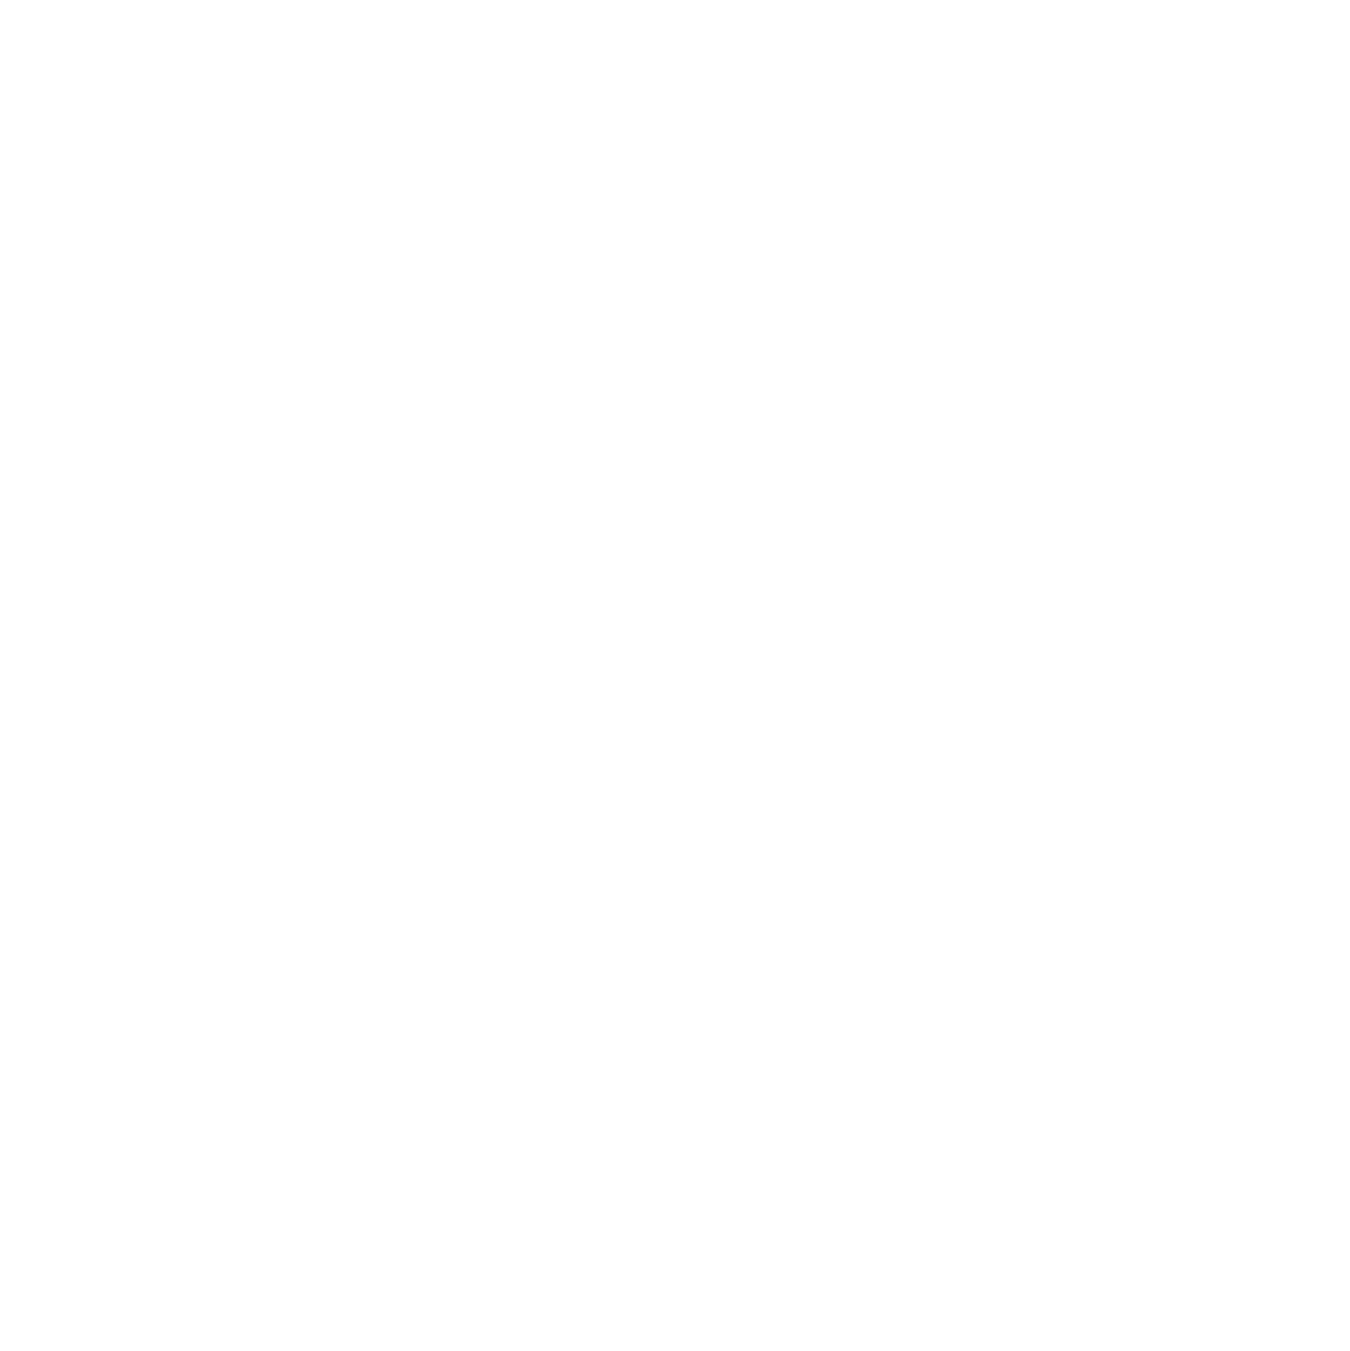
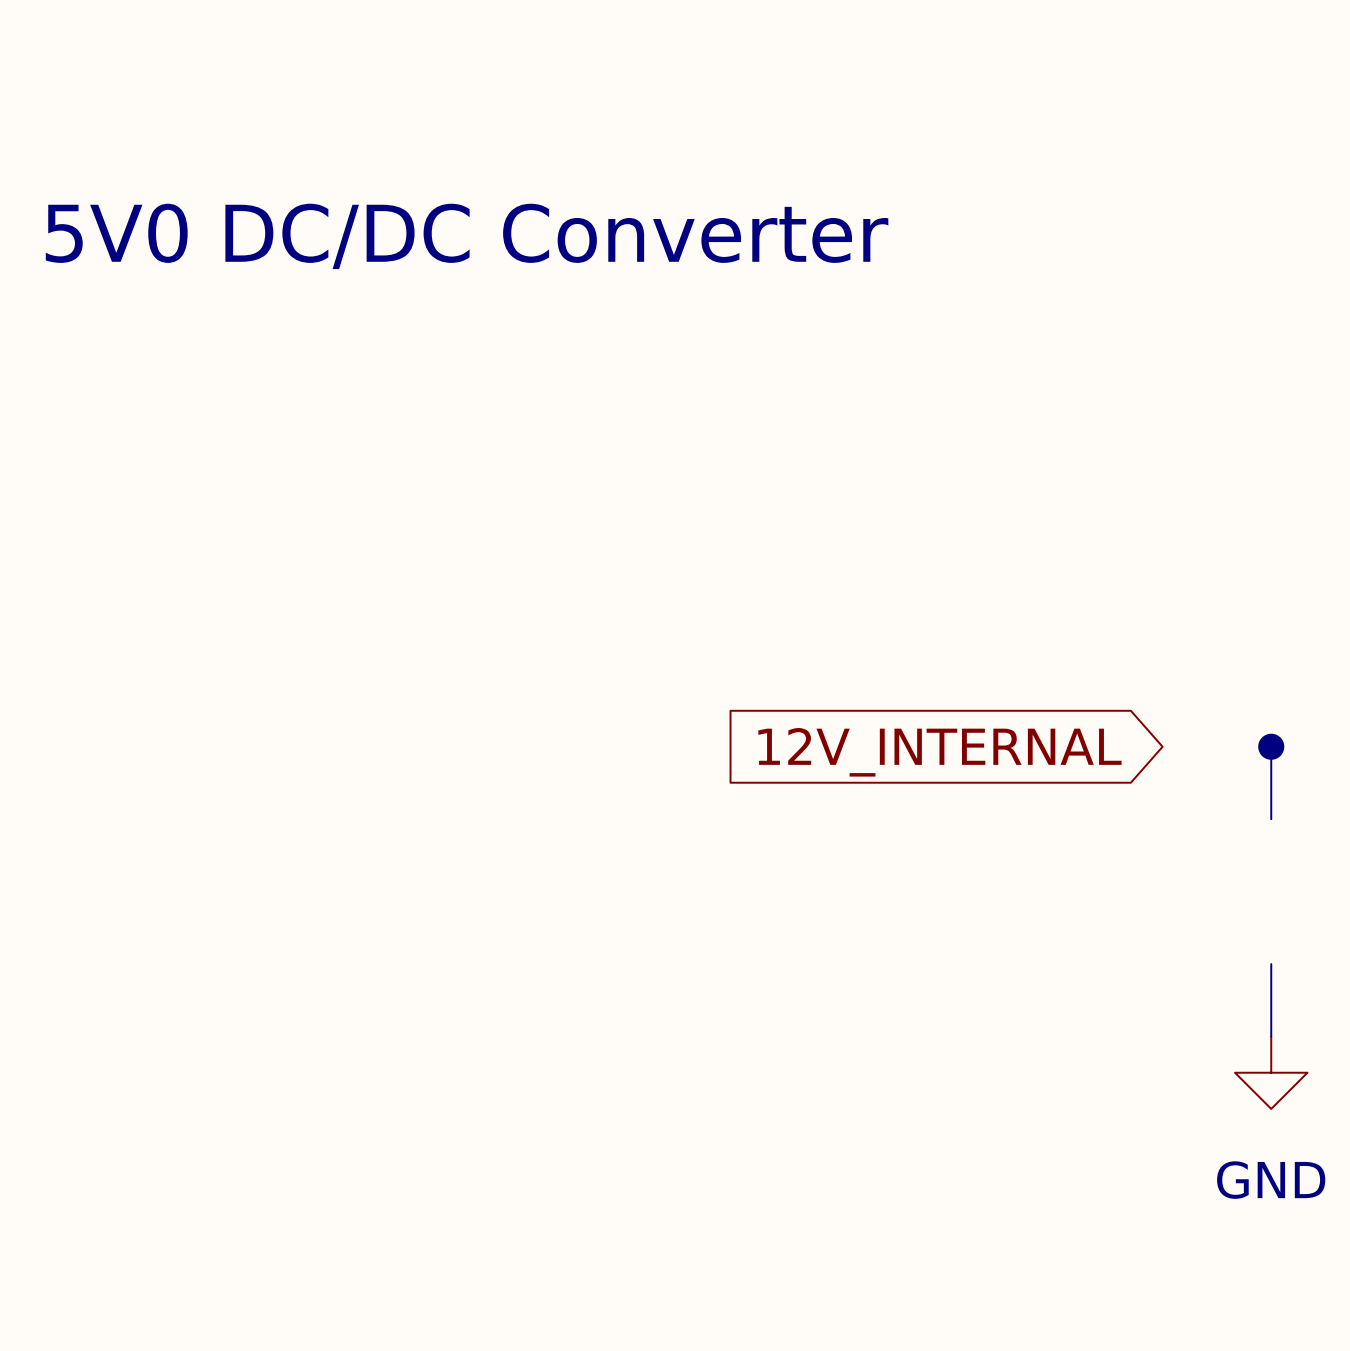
text: none -> 5V0 DC/DC Converter (467, 236)
wire: none -> (1271, 746) (1271, 819)
junction: none -> (1271, 746)
global label: none -> 12V_INTERNAL (939, 752)
wire: none -> (1271, 964) (1271, 1036)
power symbol: none -> GND (1271, 1072)

